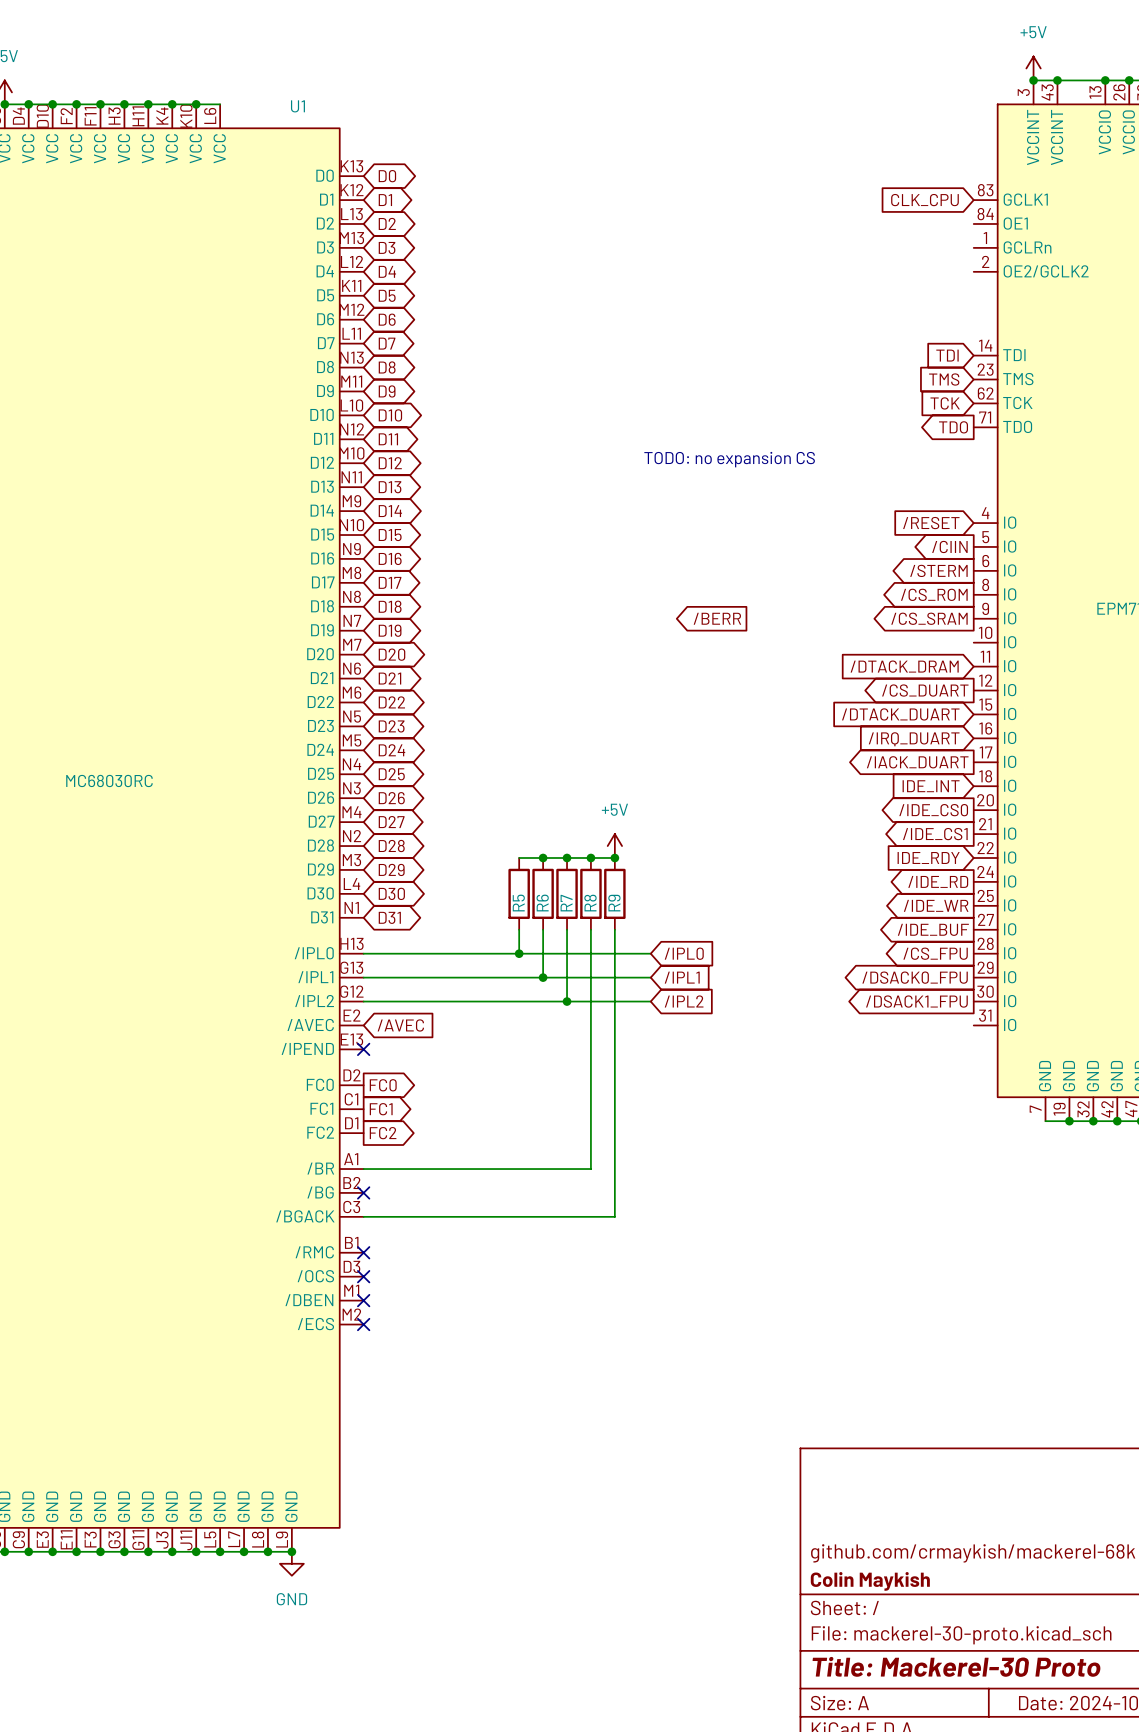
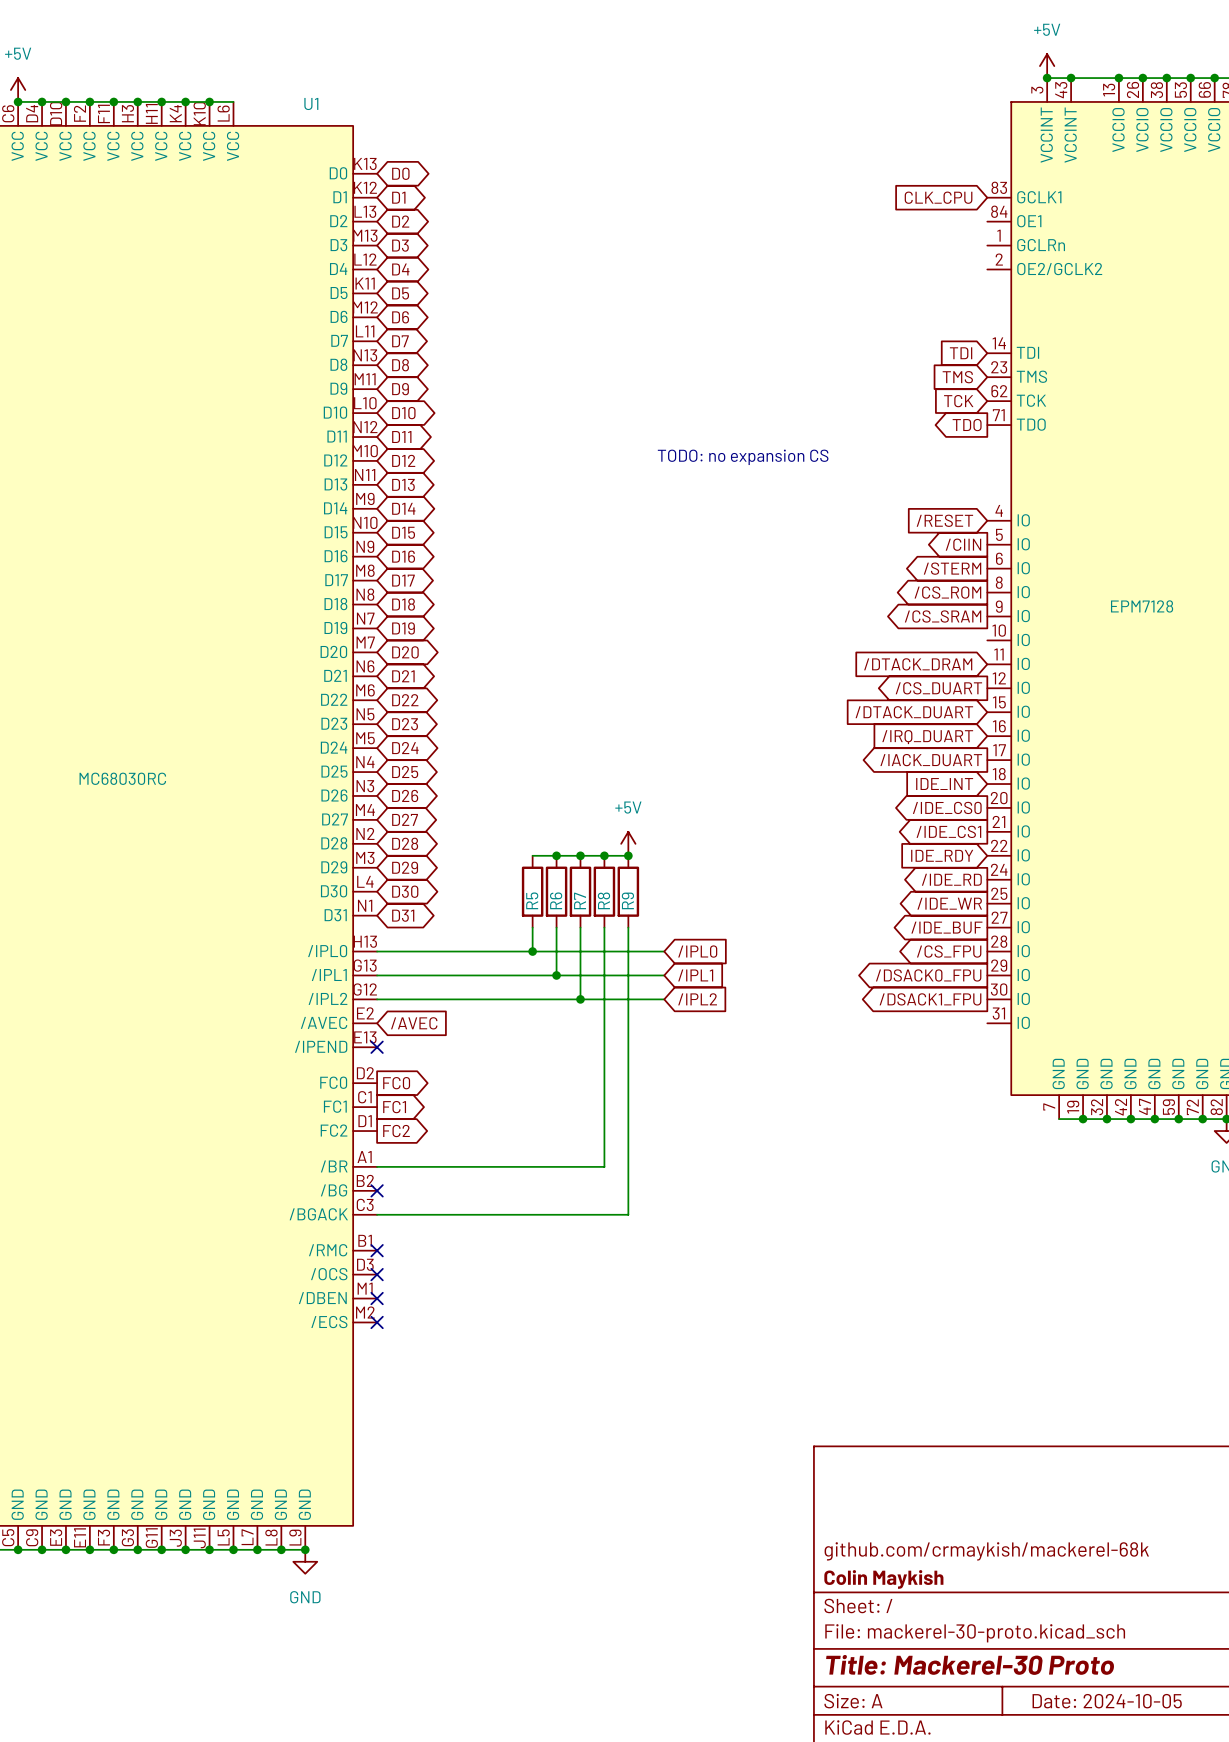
global label: /BERR (717, 618) -> none

